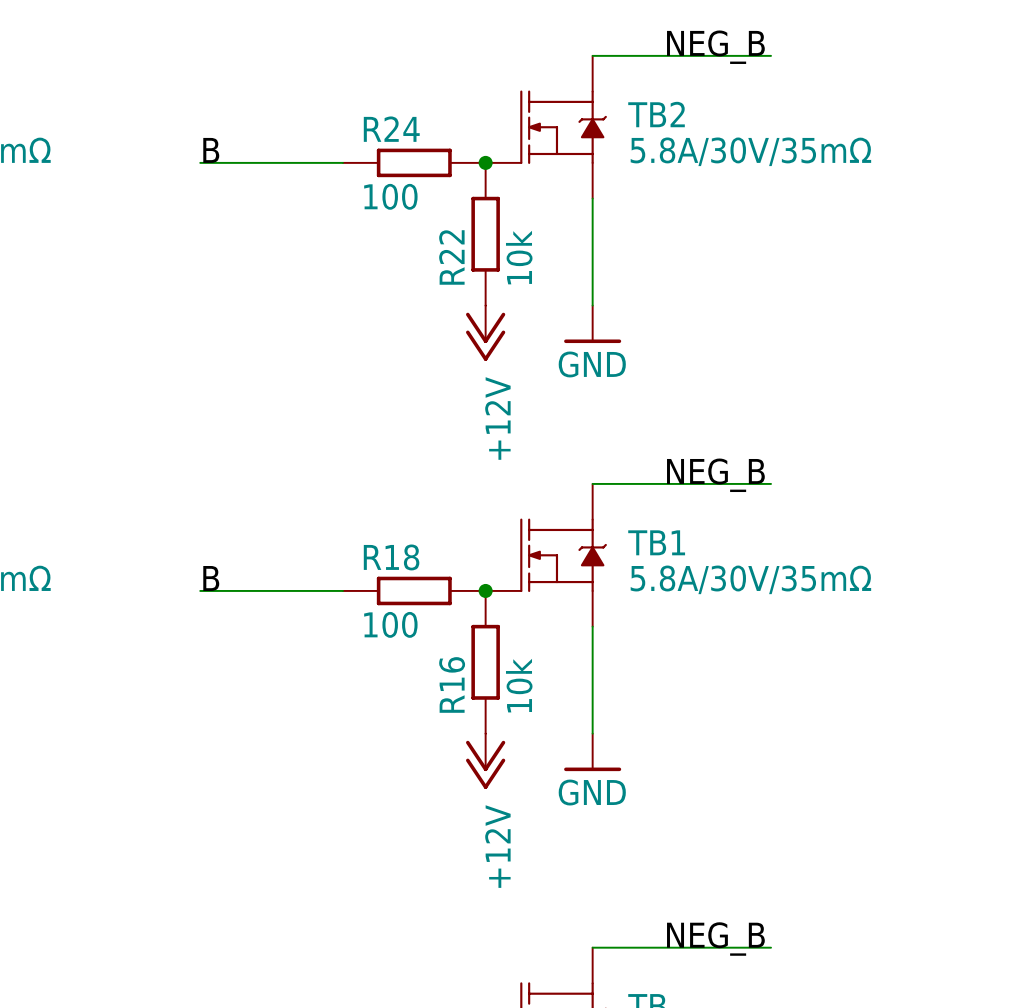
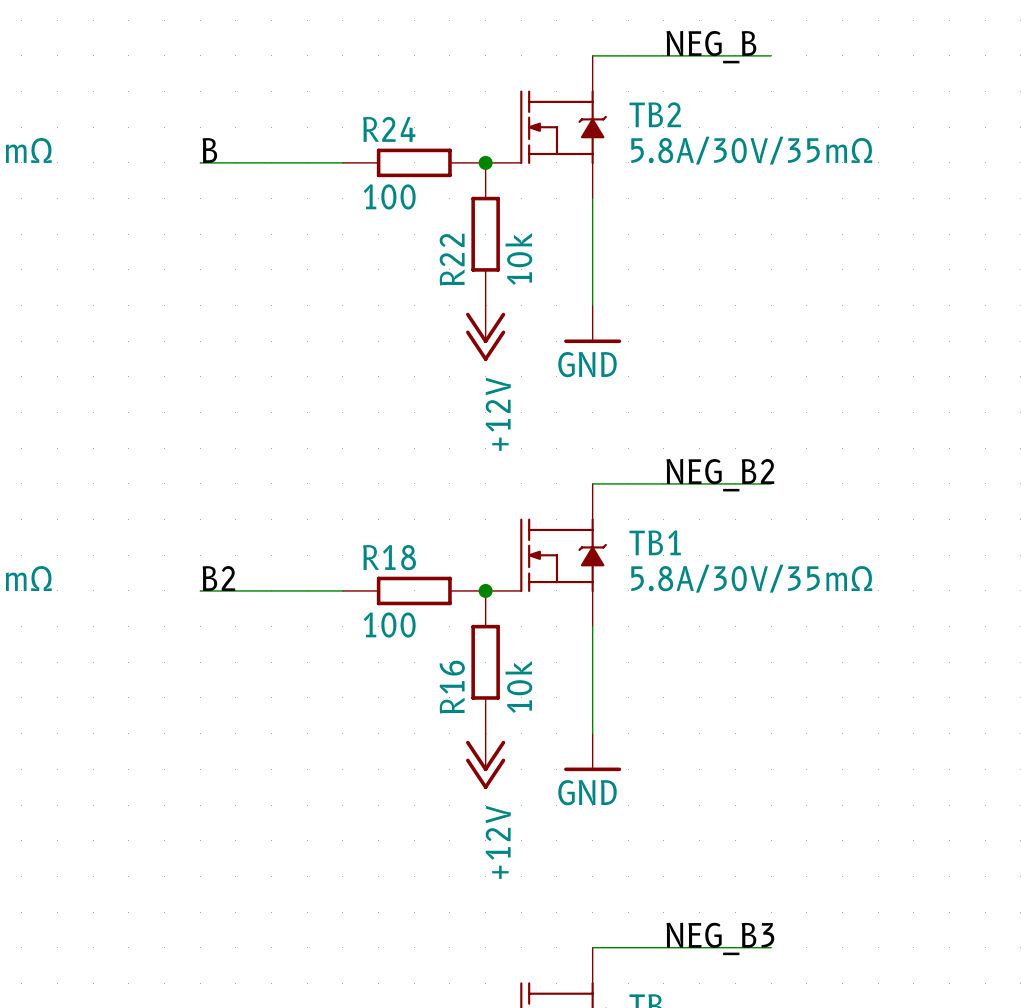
label: NEG_B (715, 475) -> NEG_B2 (720, 475)
label: B (211, 578) -> B2 (218, 578)
label: NEG_B (715, 939) -> NEG_B3 (720, 938)

